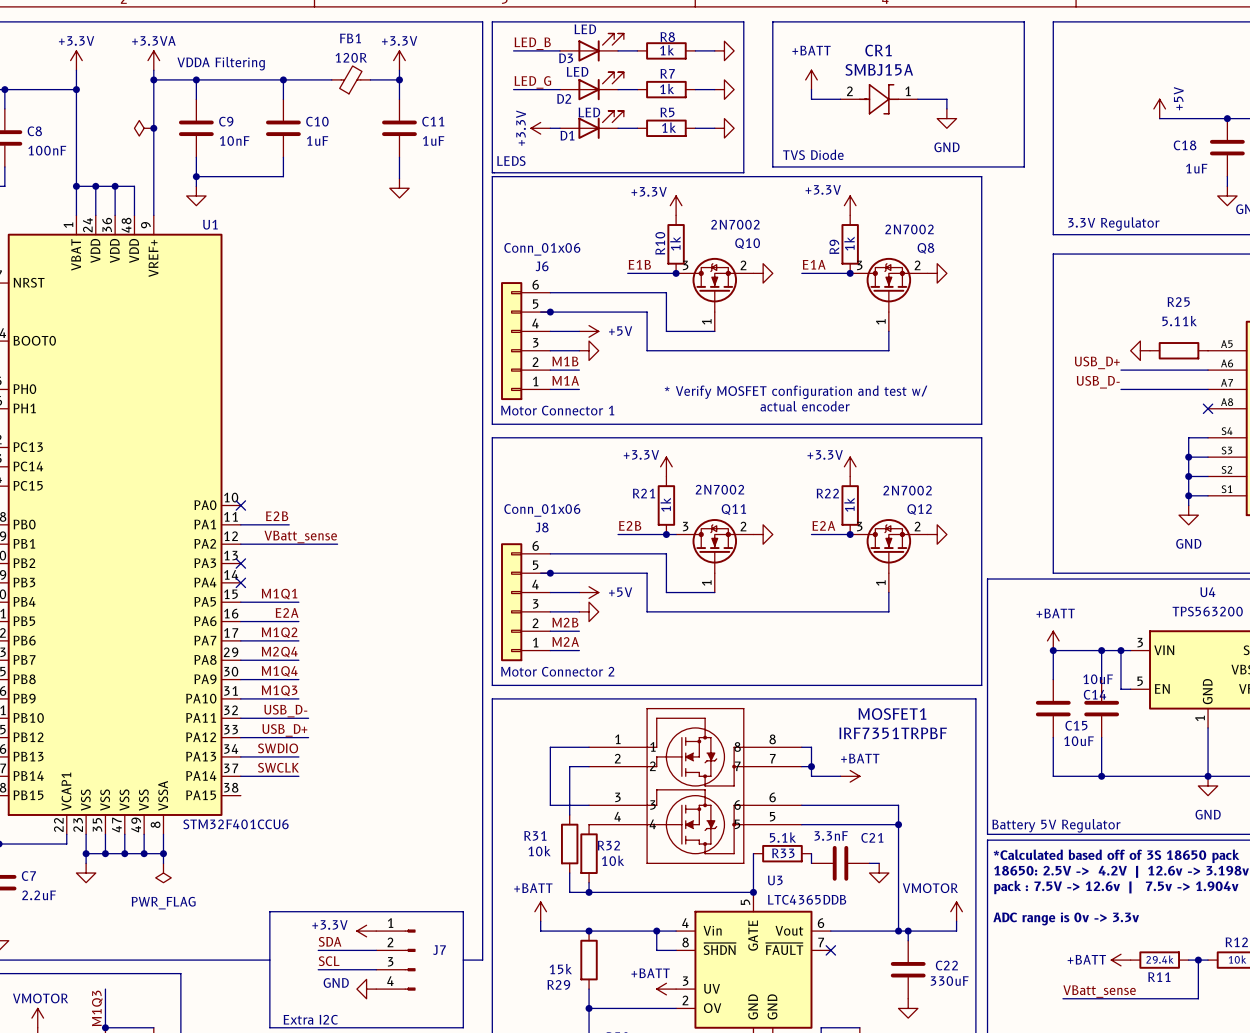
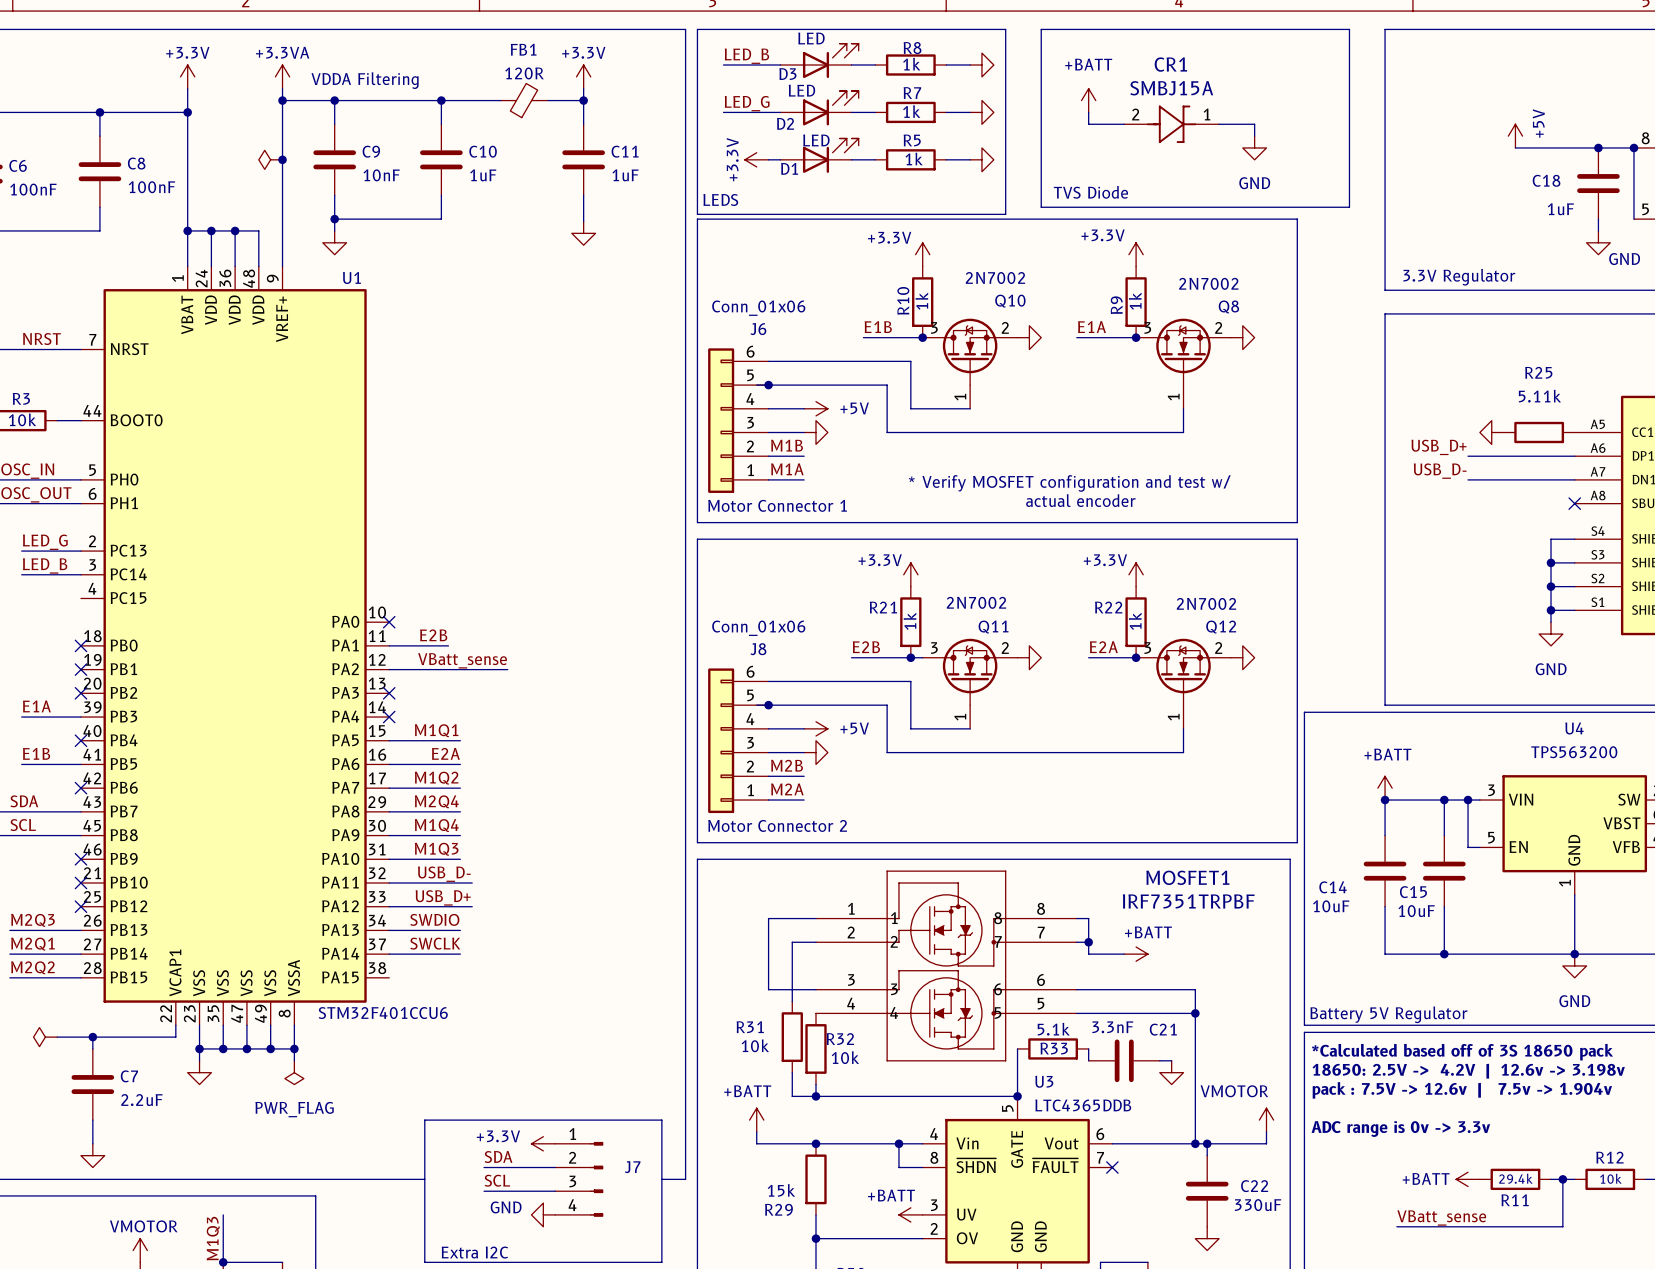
C14 value position: 10uF (1098, 679) -> 10uF (1331, 906)
C14 name position: C14 (1095, 694) -> C14 (1333, 887)

